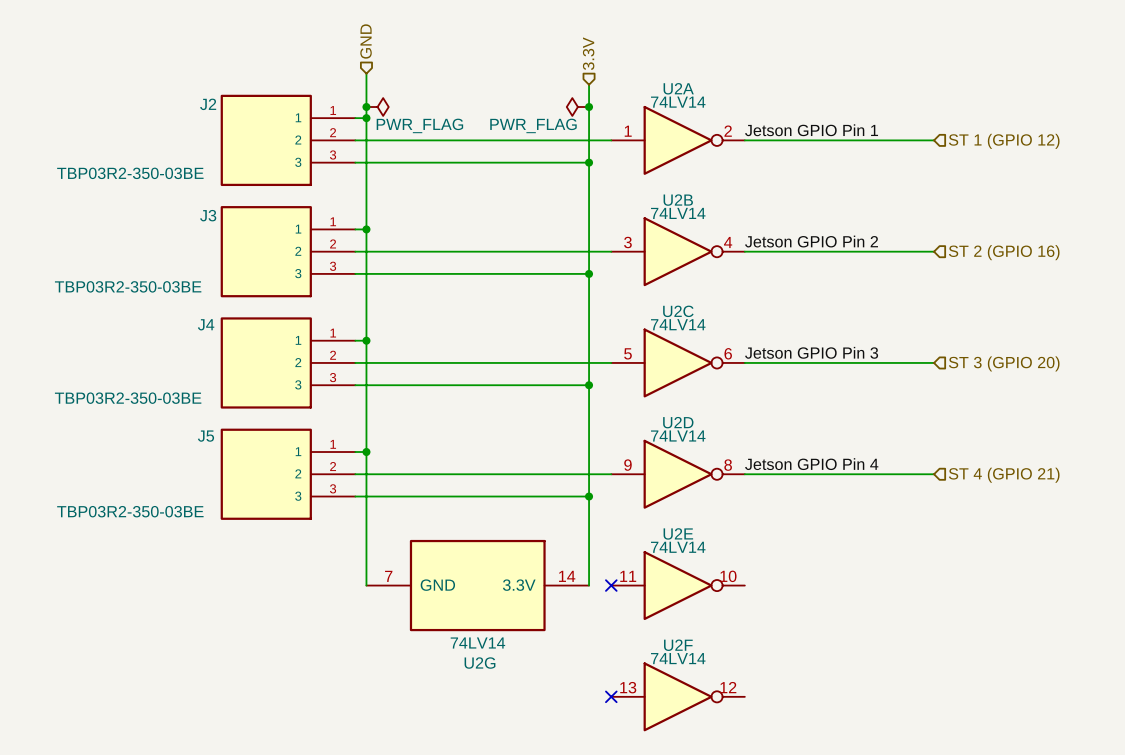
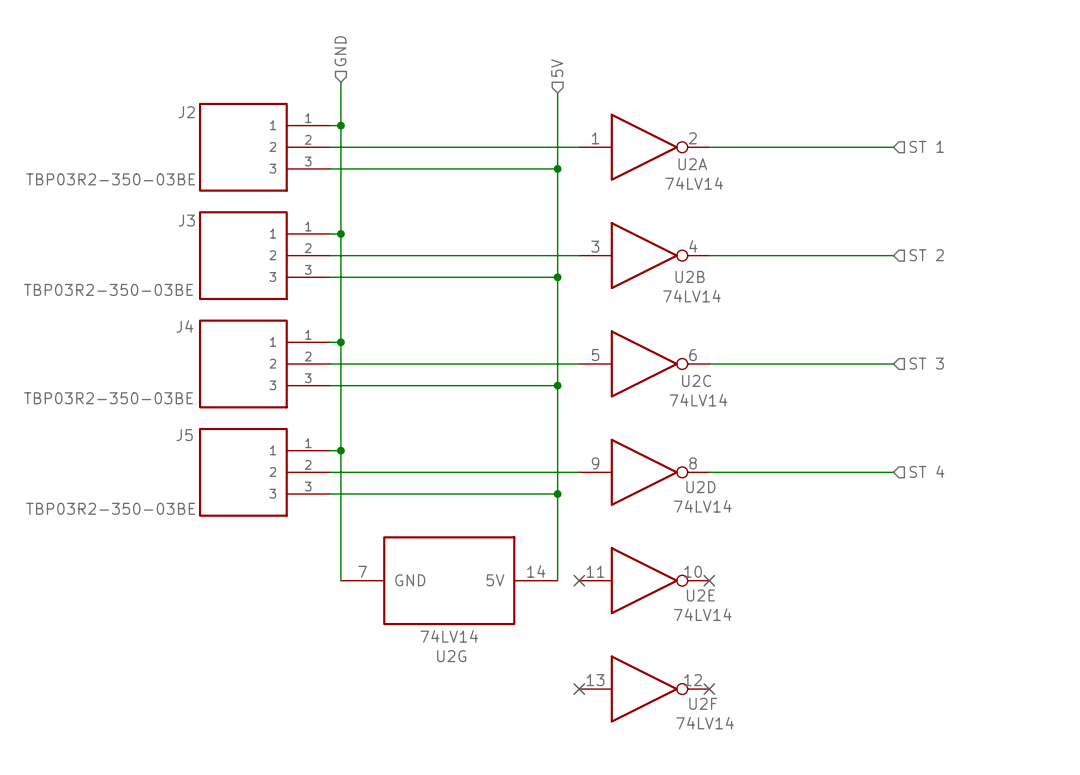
hierarchical label: 3.3V (588, 53) -> 5V (557, 68)
U2A name position: U2A (678, 88) -> U2A (692, 164)
U2A value position: 74LV14 (678, 102) -> 74LV14 (694, 183)
junction: (366, 107) -> none
power symbol: PWR_FLAG (377, 107) -> none
power symbol: PWR_FLAG (577, 107) -> none
junction: (589, 107) -> none
label: Jetson GPIO Pin 1 (811, 130) -> none
hierarchical label: ST 1 (GPIO 12) (1004, 141) -> ST 1 (926, 146)
U2B name position: U2B (678, 200) -> U2B (690, 276)
U2B value position: 74LV14 (678, 213) -> 74LV14 (691, 296)
label: Jetson GPIO Pin 2 (811, 241) -> none
hierarchical label: ST 2 (GPIO 16) (1004, 252) -> ST 2 (926, 255)
U2C name position: U2C (678, 311) -> U2C (696, 380)
U2C value position: 74LV14 (678, 324) -> 74LV14 (698, 400)
label: Jetson GPIO Pin 3 (811, 352) -> none
hierarchical label: ST 3 (GPIO 20) (1004, 363) -> ST 3 (926, 363)
U2D name position: U2D (678, 422) -> U2D (700, 487)
U2D value position: 74LV14 (678, 436) -> 74LV14 (702, 506)
label: Jetson GPIO Pin 4 (811, 464) -> none
hierarchical label: ST 4 (GPIO 21) (1004, 475) -> ST 4 (926, 471)
U2E name position: U2E (678, 533) -> U2E (700, 595)
U2E value position: 74LV14 (678, 547) -> 74LV14 (702, 614)
U2G pin name: 3.3V (519, 585) -> 5V (495, 580)
no-connect mark: none -> (709, 580)
U2F name position: U2F (678, 645) -> U2F (703, 703)
U2F value position: 74LV14 (678, 658) -> 74LV14 (704, 723)
no-connect mark: none -> (709, 689)

